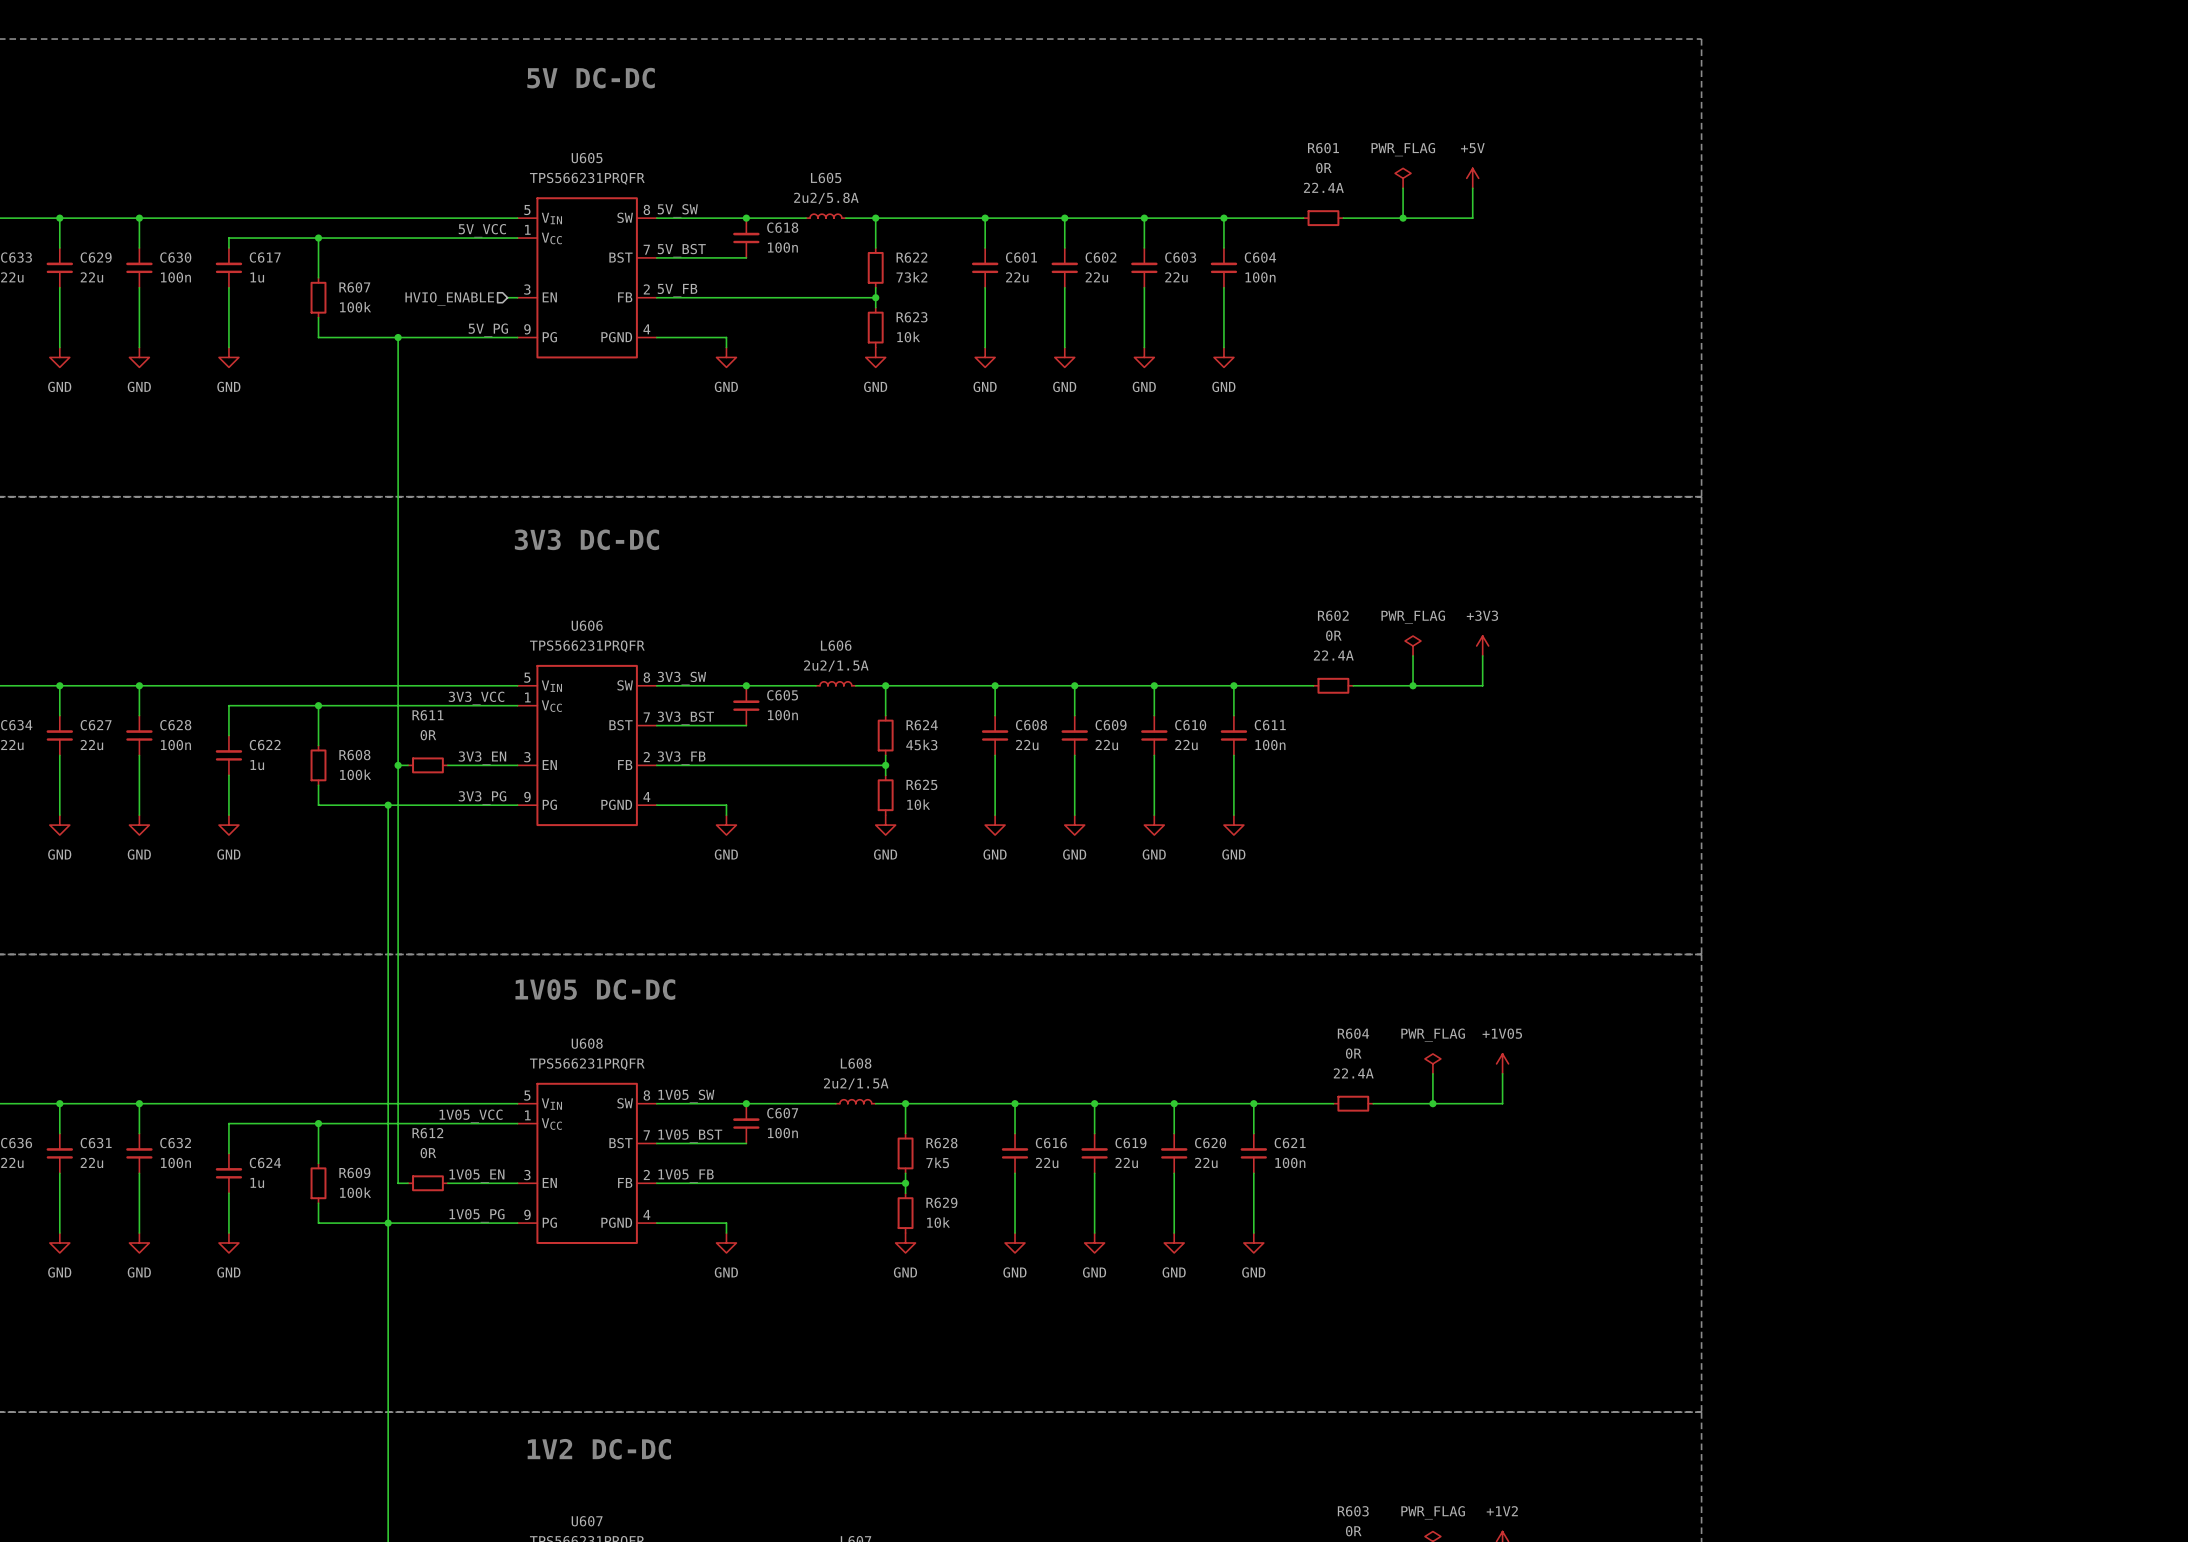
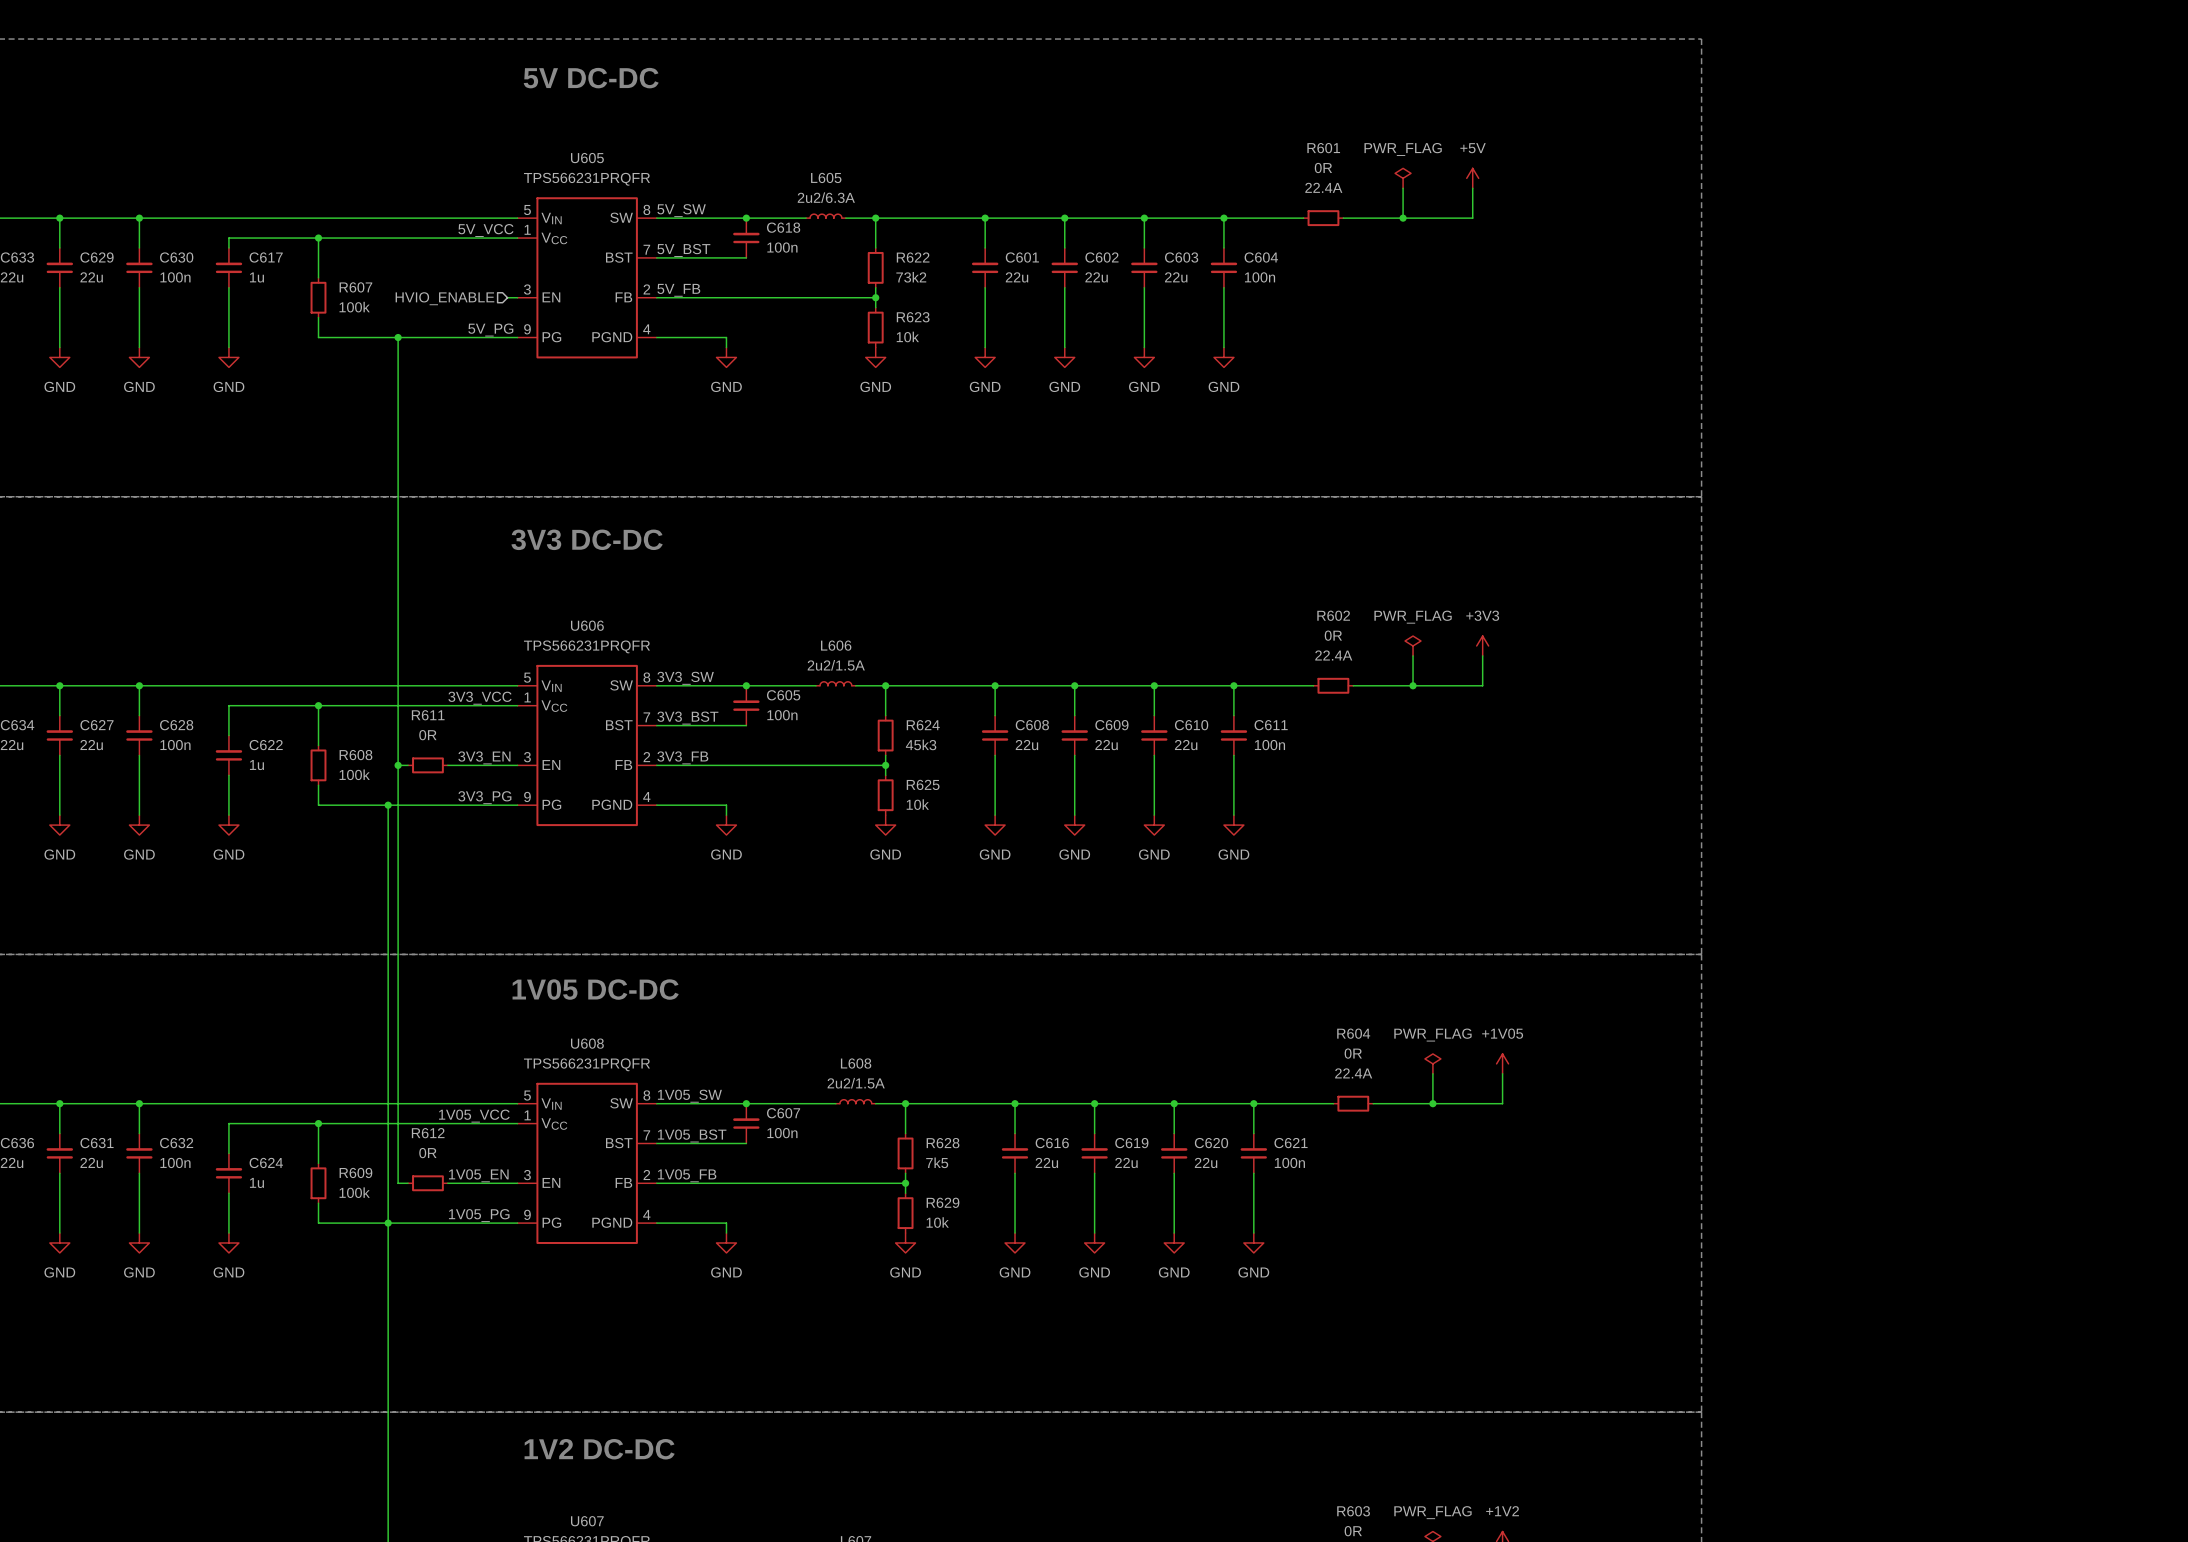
L605 text: 2u2/5.8A (826, 198) -> 2u2/6.3A (826, 197)

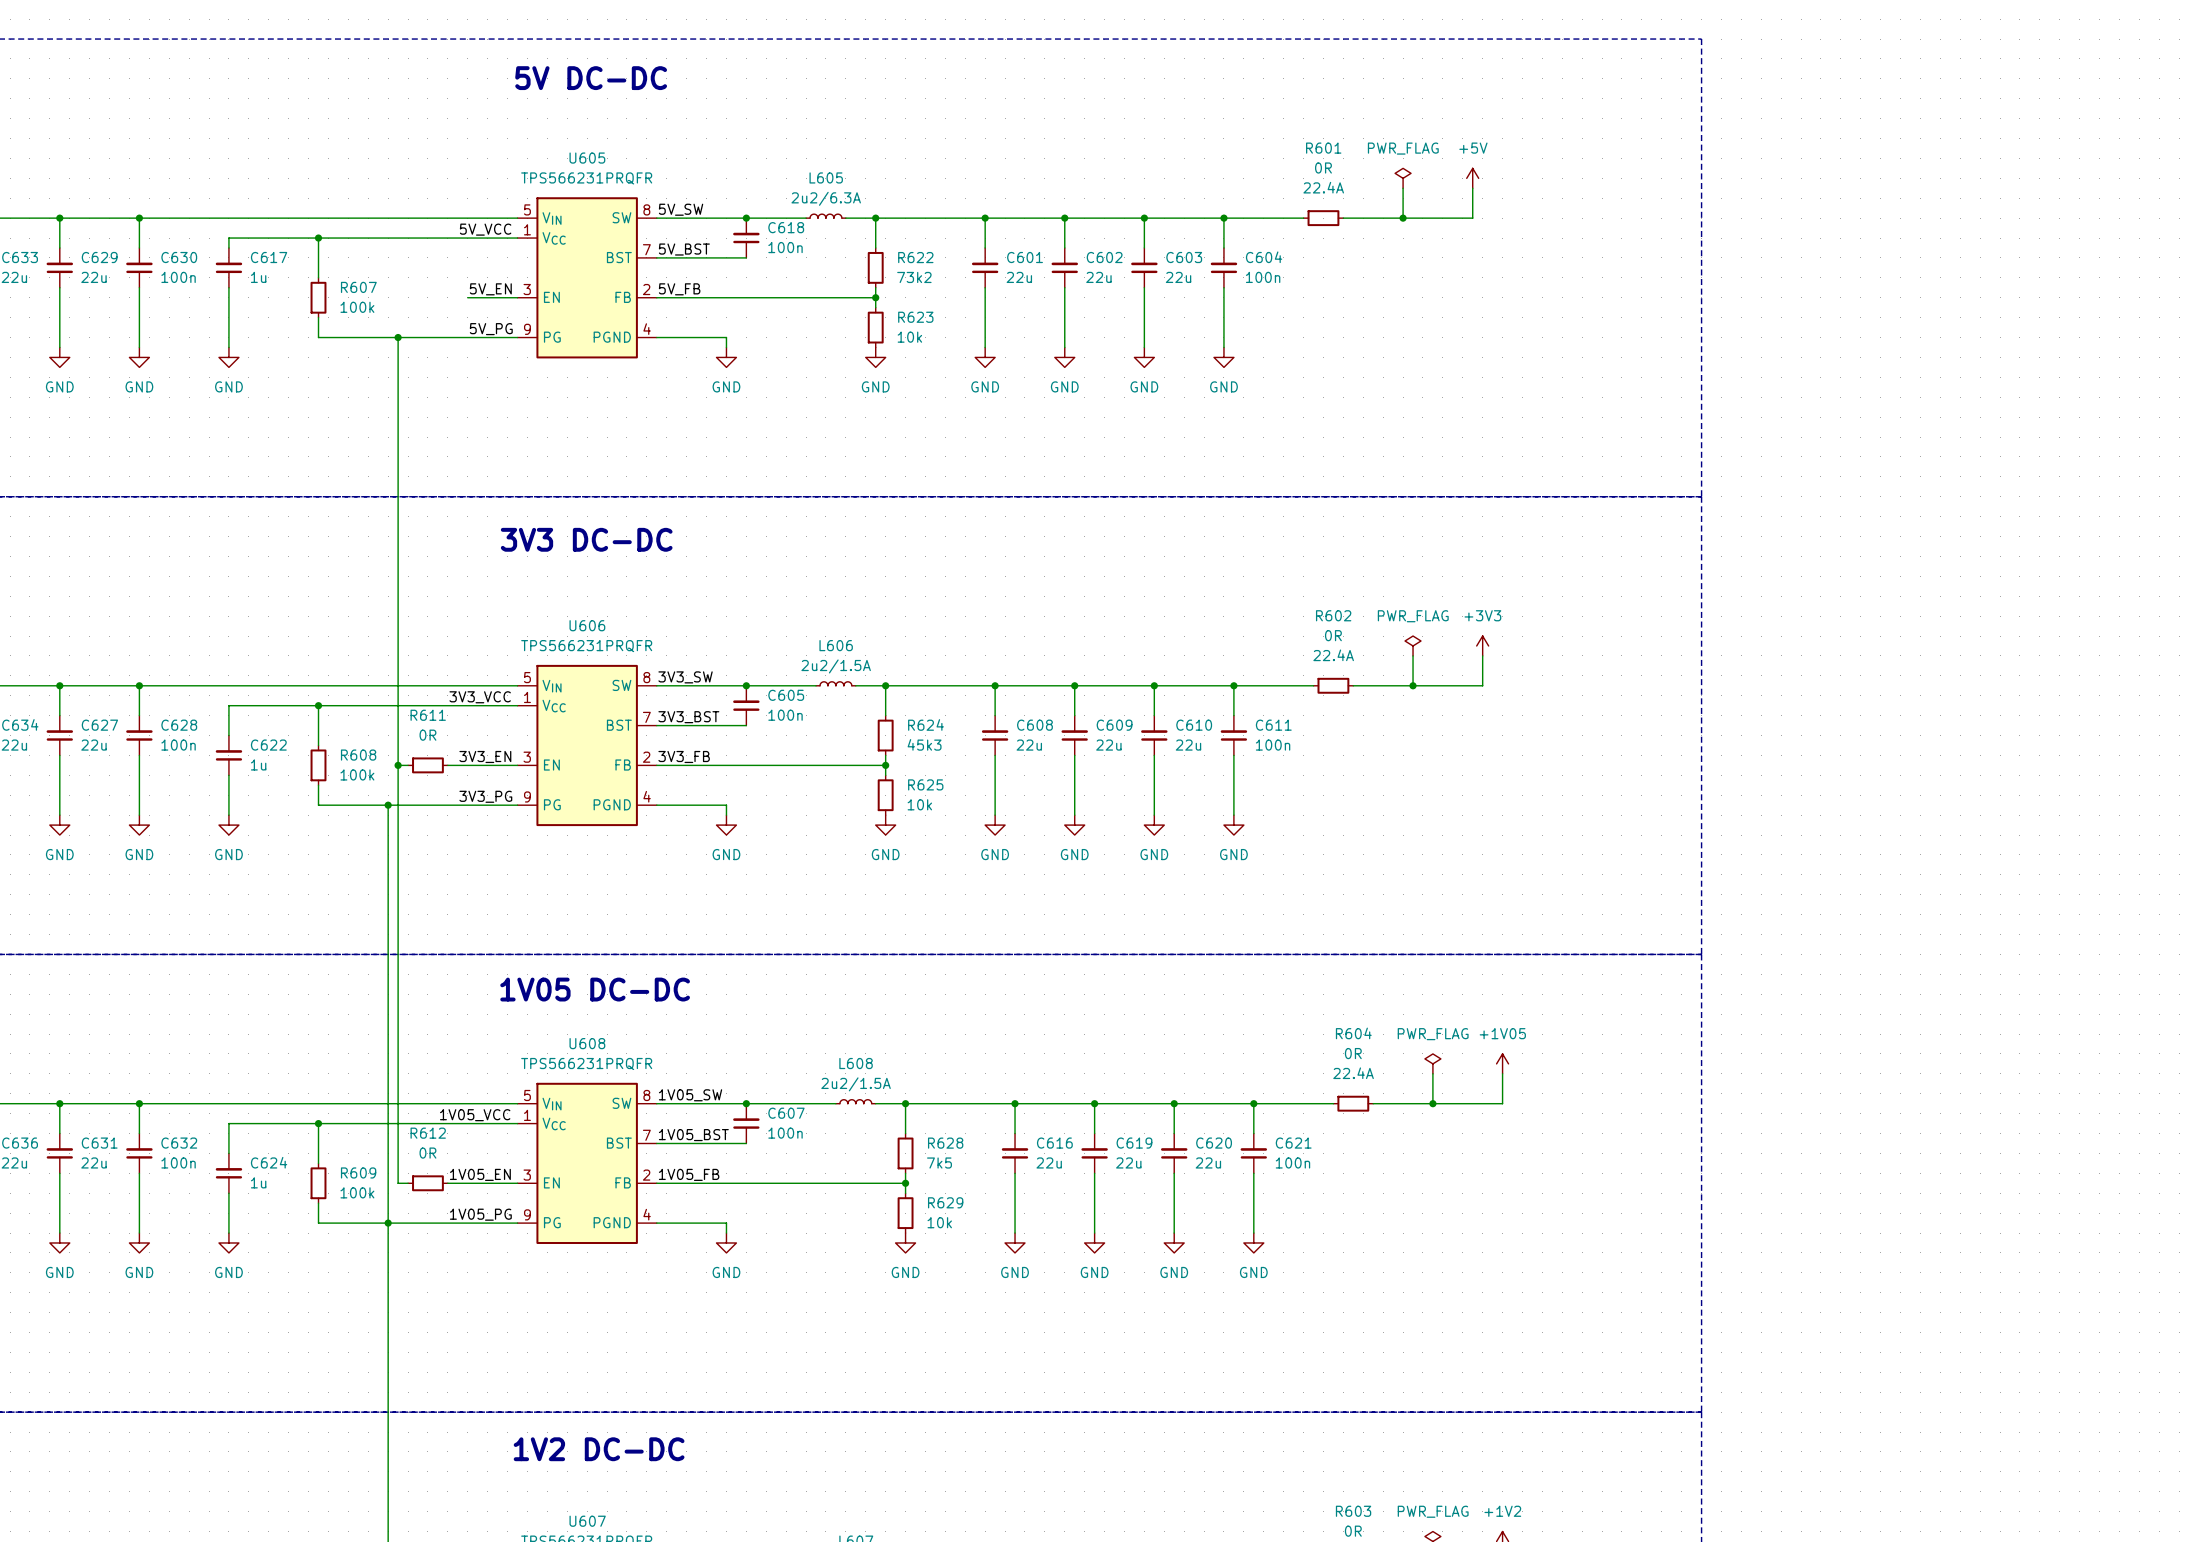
label: none -> 5V_EN (490, 289)
wire: none -> (467, 297) (507, 297)
hierarchical label: HVIO_ENABLE (444, 298) -> none

